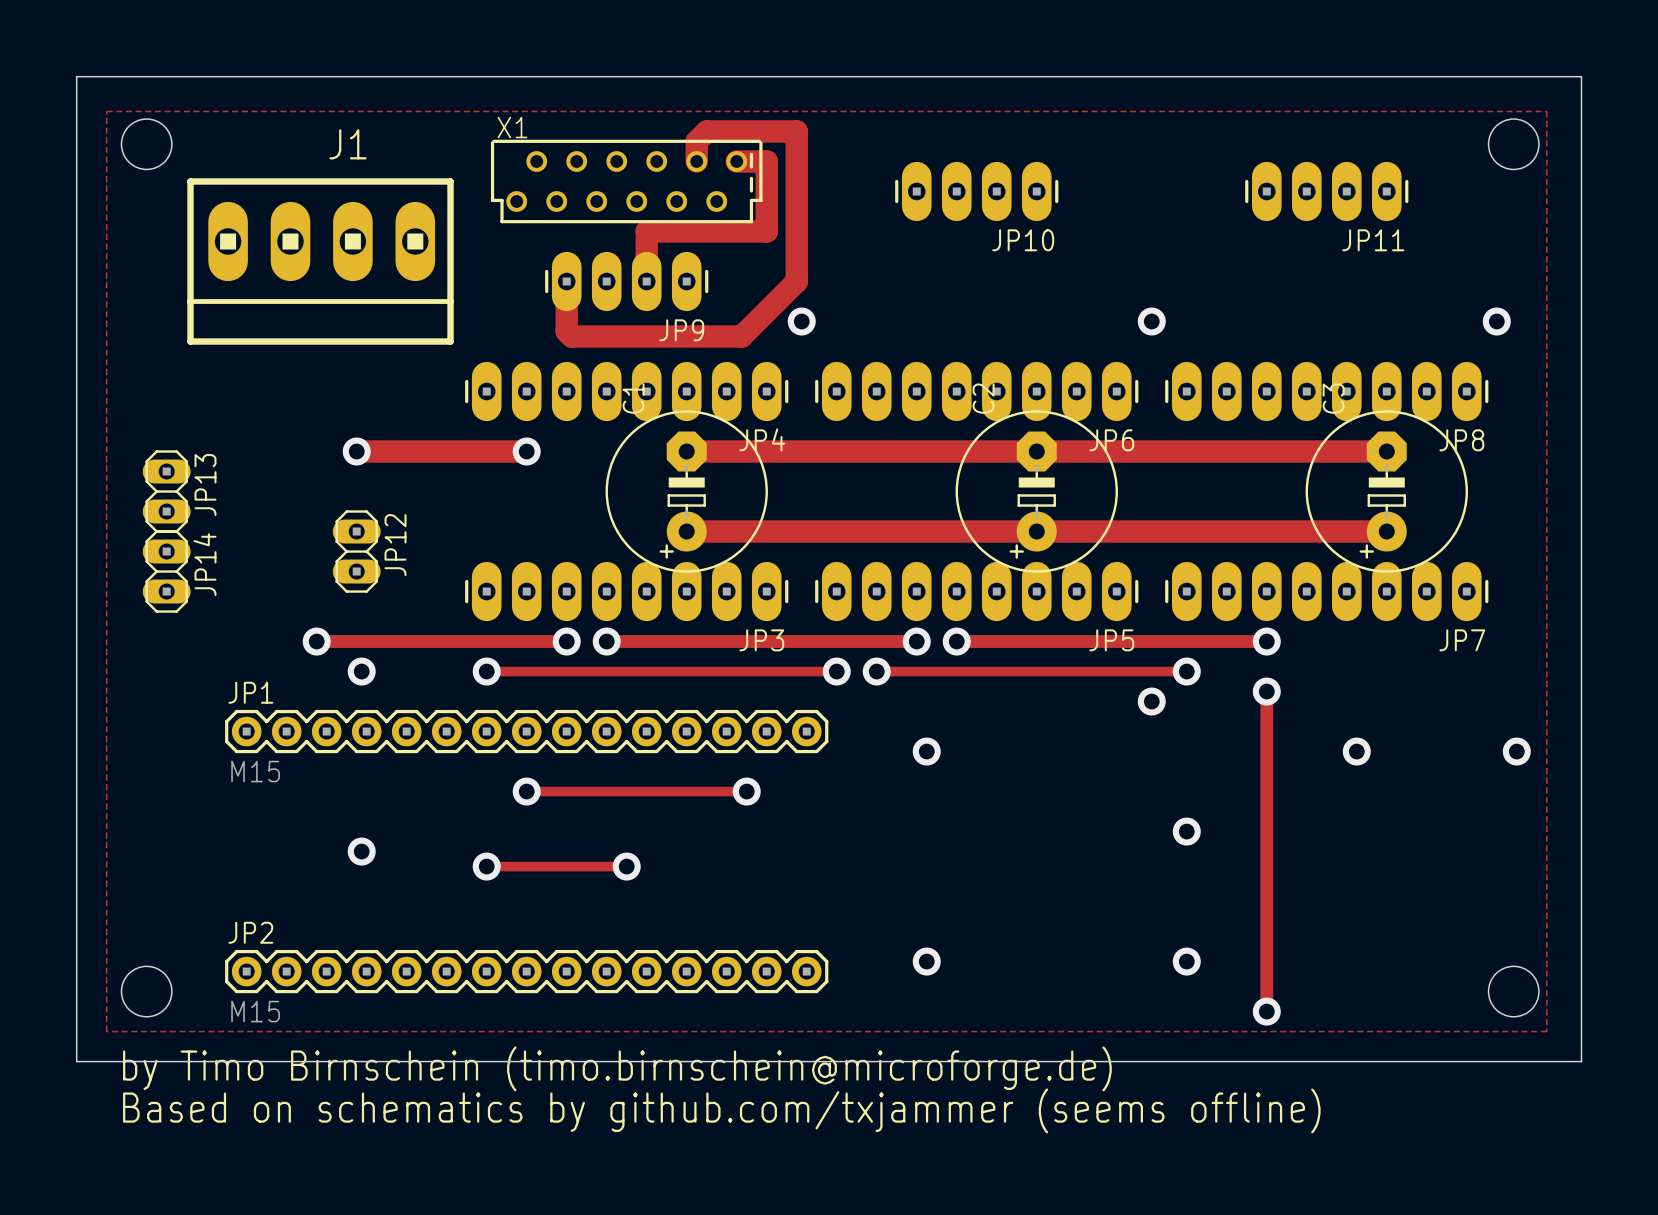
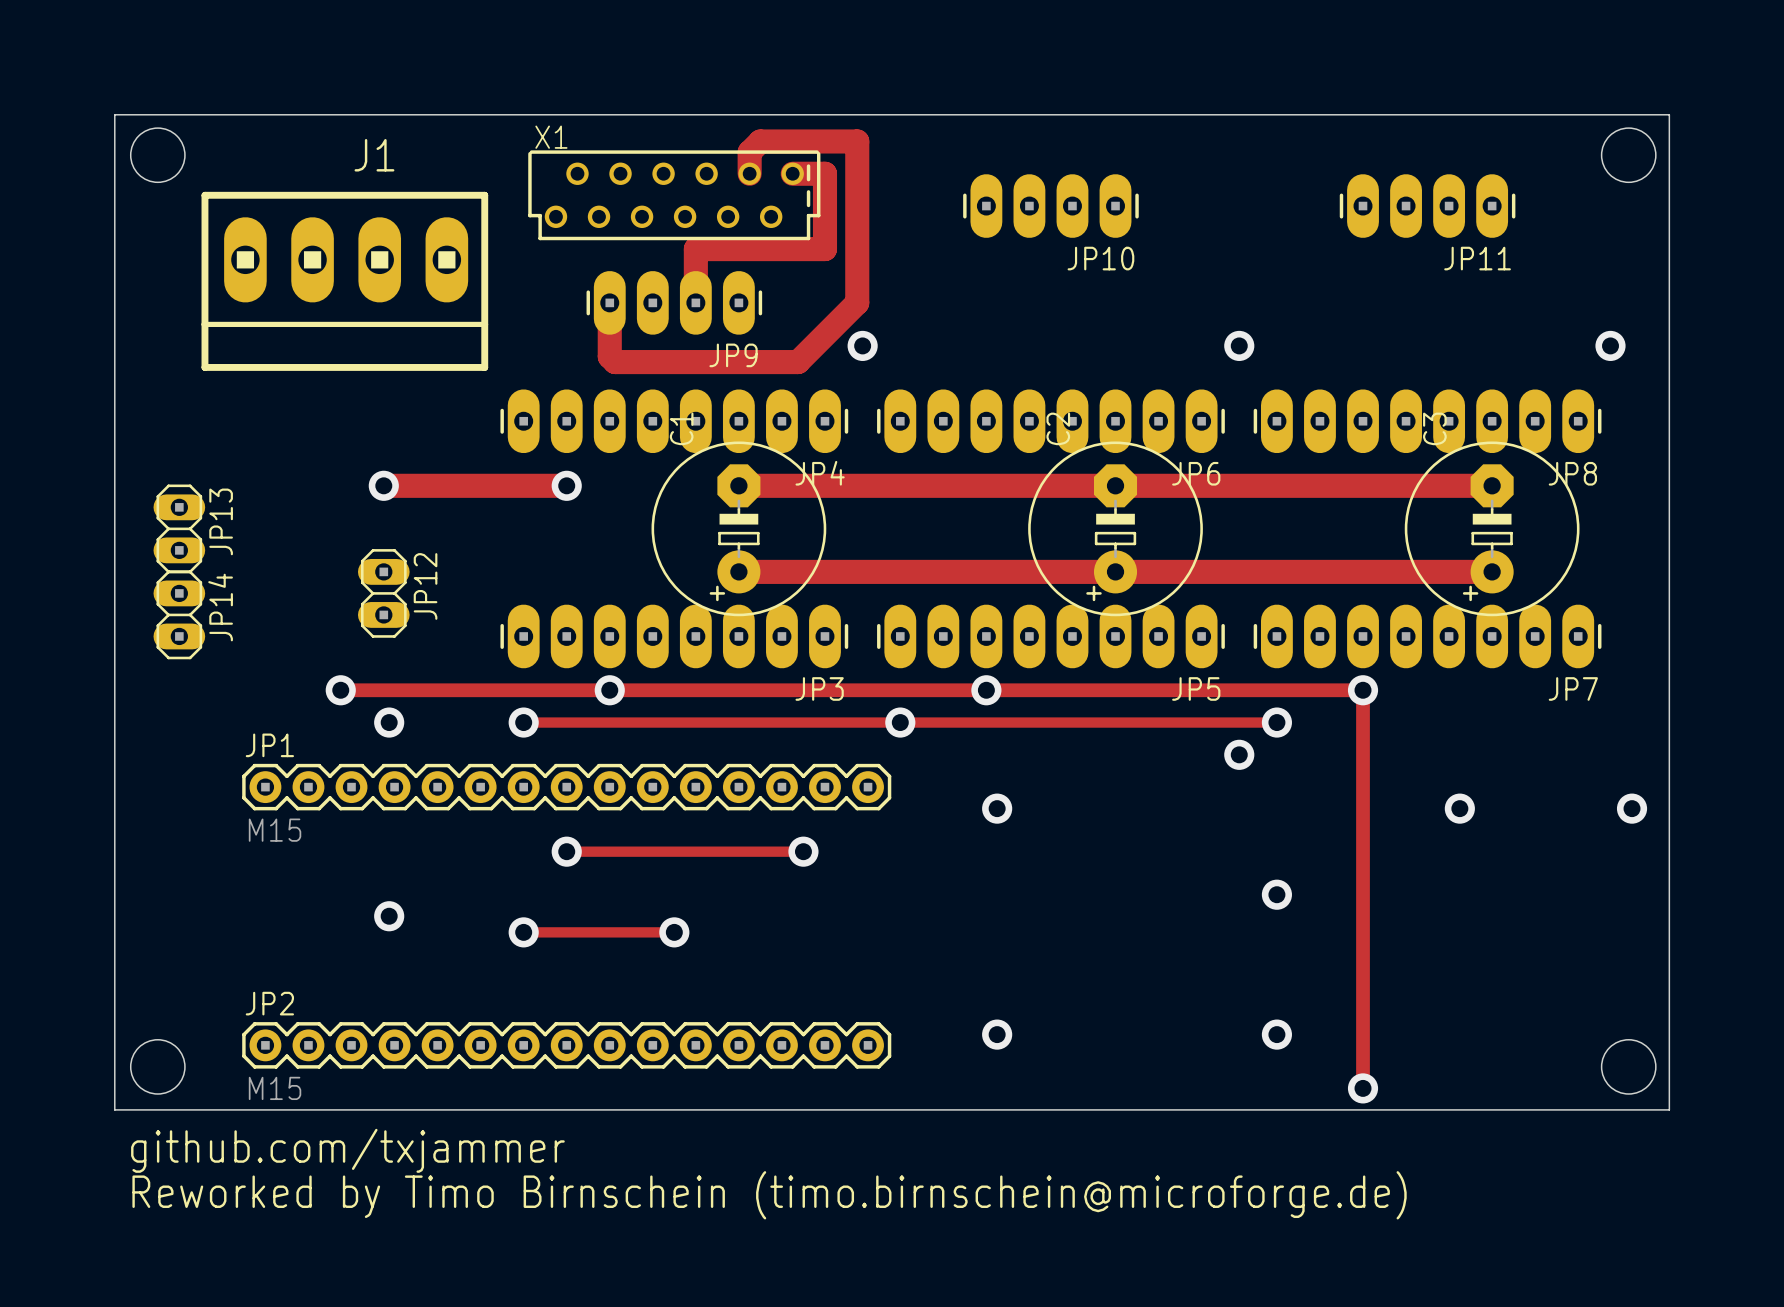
board edge: (76, 76) (1581, 76) (1581, 1061) (76, 1061) (76, 76) -> (114, 114) (114, 1109) (1669, 1109) (1669, 114) (114, 114)
zone outline: (106, 111) (1546, 111) (1546, 1031) (106, 1031) (106, 111) -> none
track: none -> (609, 690) (652, 690)
via: (606, 641) -> none
track: none -> (986, 690) (1029, 690)
via: (956, 641) -> none
track: none -> (1363, 690) (1363, 744)
track: none -> (900, 722) (943, 722)
via: (876, 671) -> none
via: (1266, 691) -> none
text: by Timo Birnschein (timo.birnschein@microforge.de) (617, 1068) -> github.com/txjammer (347, 1150)
text: Based on schematics by github.com/txjammer (seems offline) (721, 1110) -> Reworked by Timo Birnschein (timo.birnschein@microforge.de) (769, 1195)

